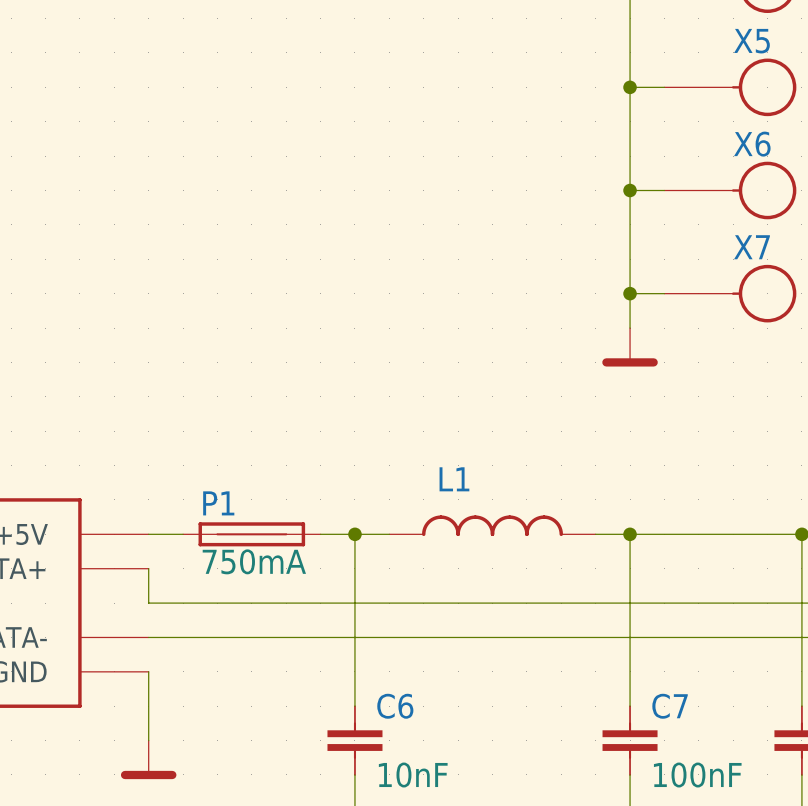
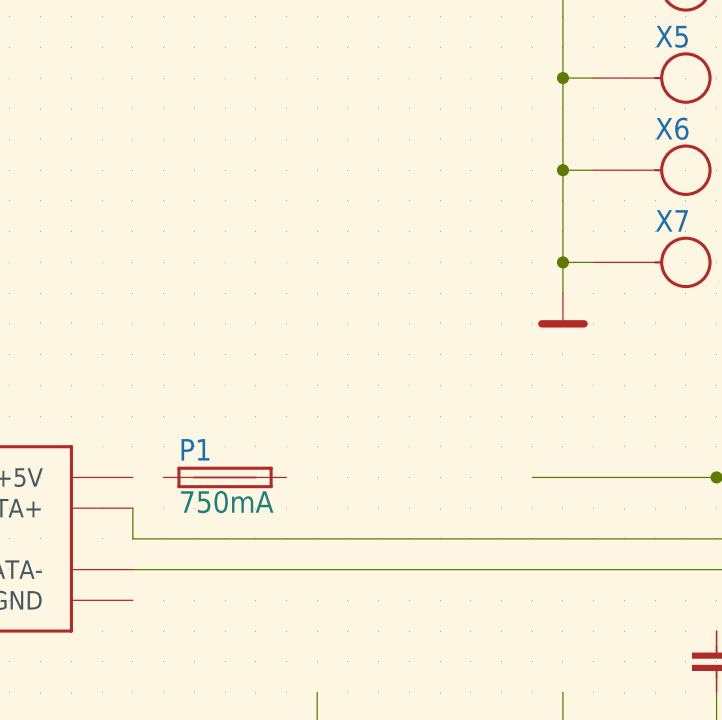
L1: (492, 525) -> none
wire: (148, 534) (183, 534) -> none
wire: (320, 534) (389, 534) -> none
wire: (354, 534) (354, 706) -> none
junction: (354, 534) -> none
wire: (630, 534) (630, 706) -> none
junction: (630, 534) -> none
wire: (801, 534) (801, 706) -> none
wire: (148, 671) (148, 740) -> none
C6: 10nF (354, 740) -> none
C7: 100nF (630, 740) -> none
power symbol: (148, 759) -> none

